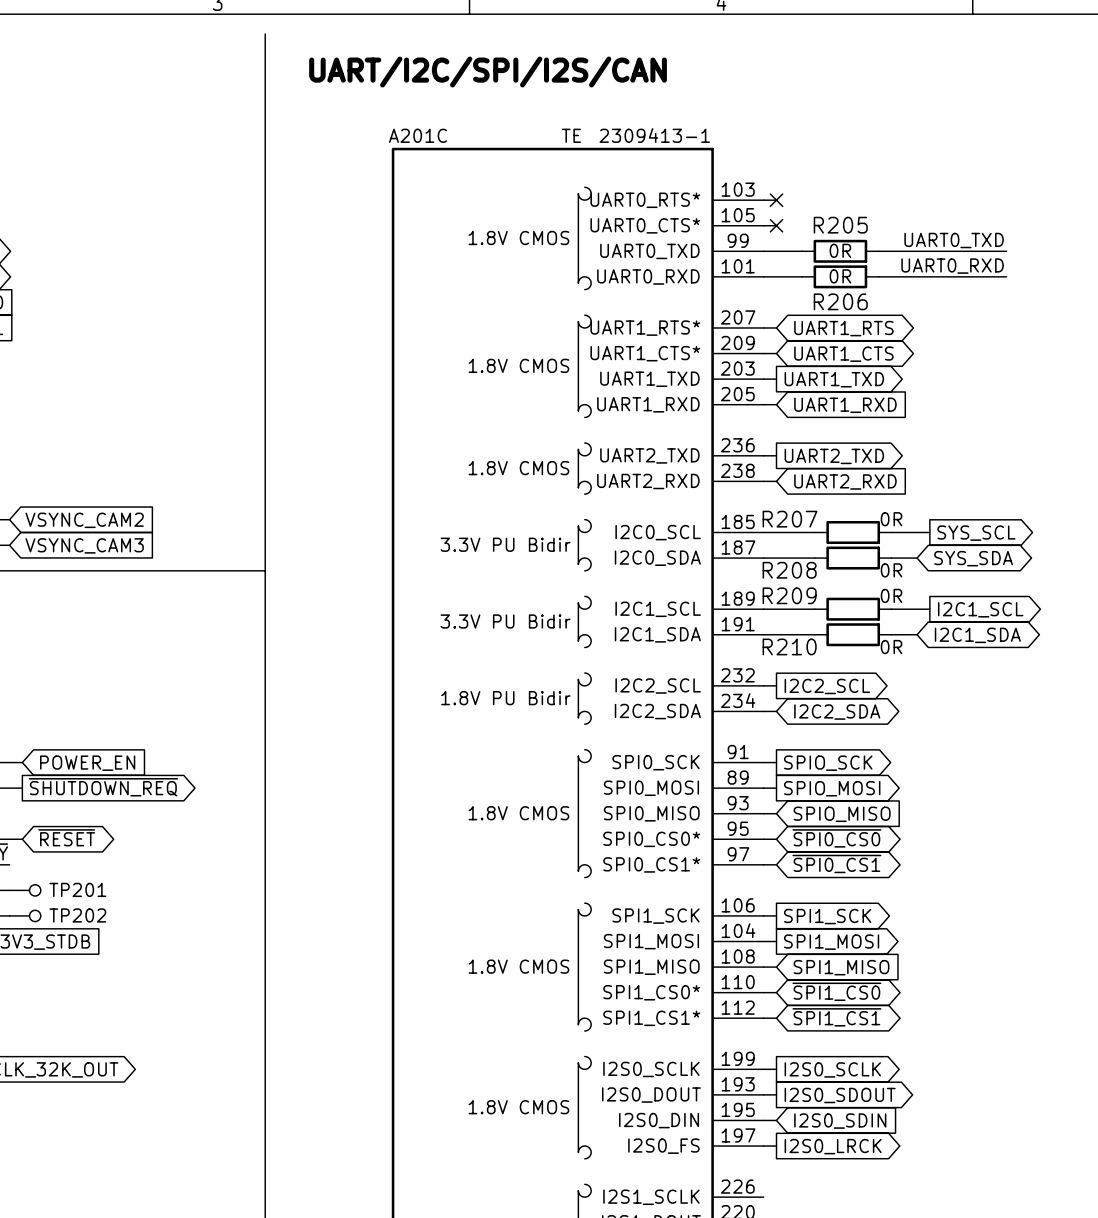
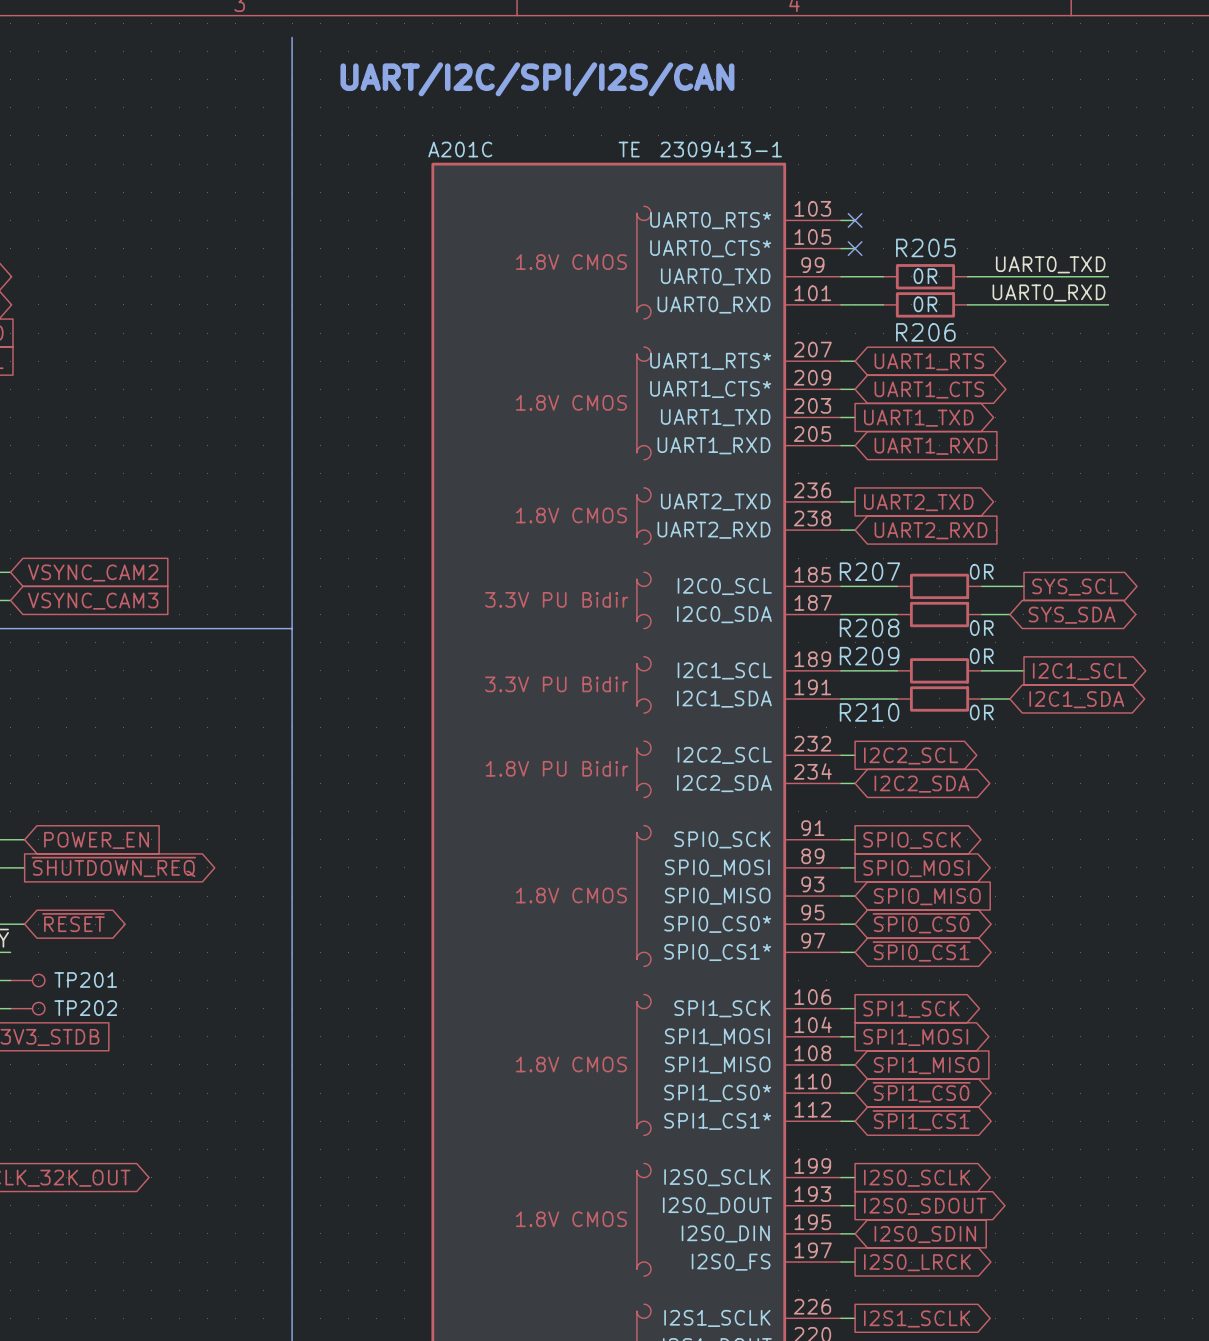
wire: none -> (841, 1318) (855, 1318)
global label: none -> I2S1_SCLK (917, 1318)

